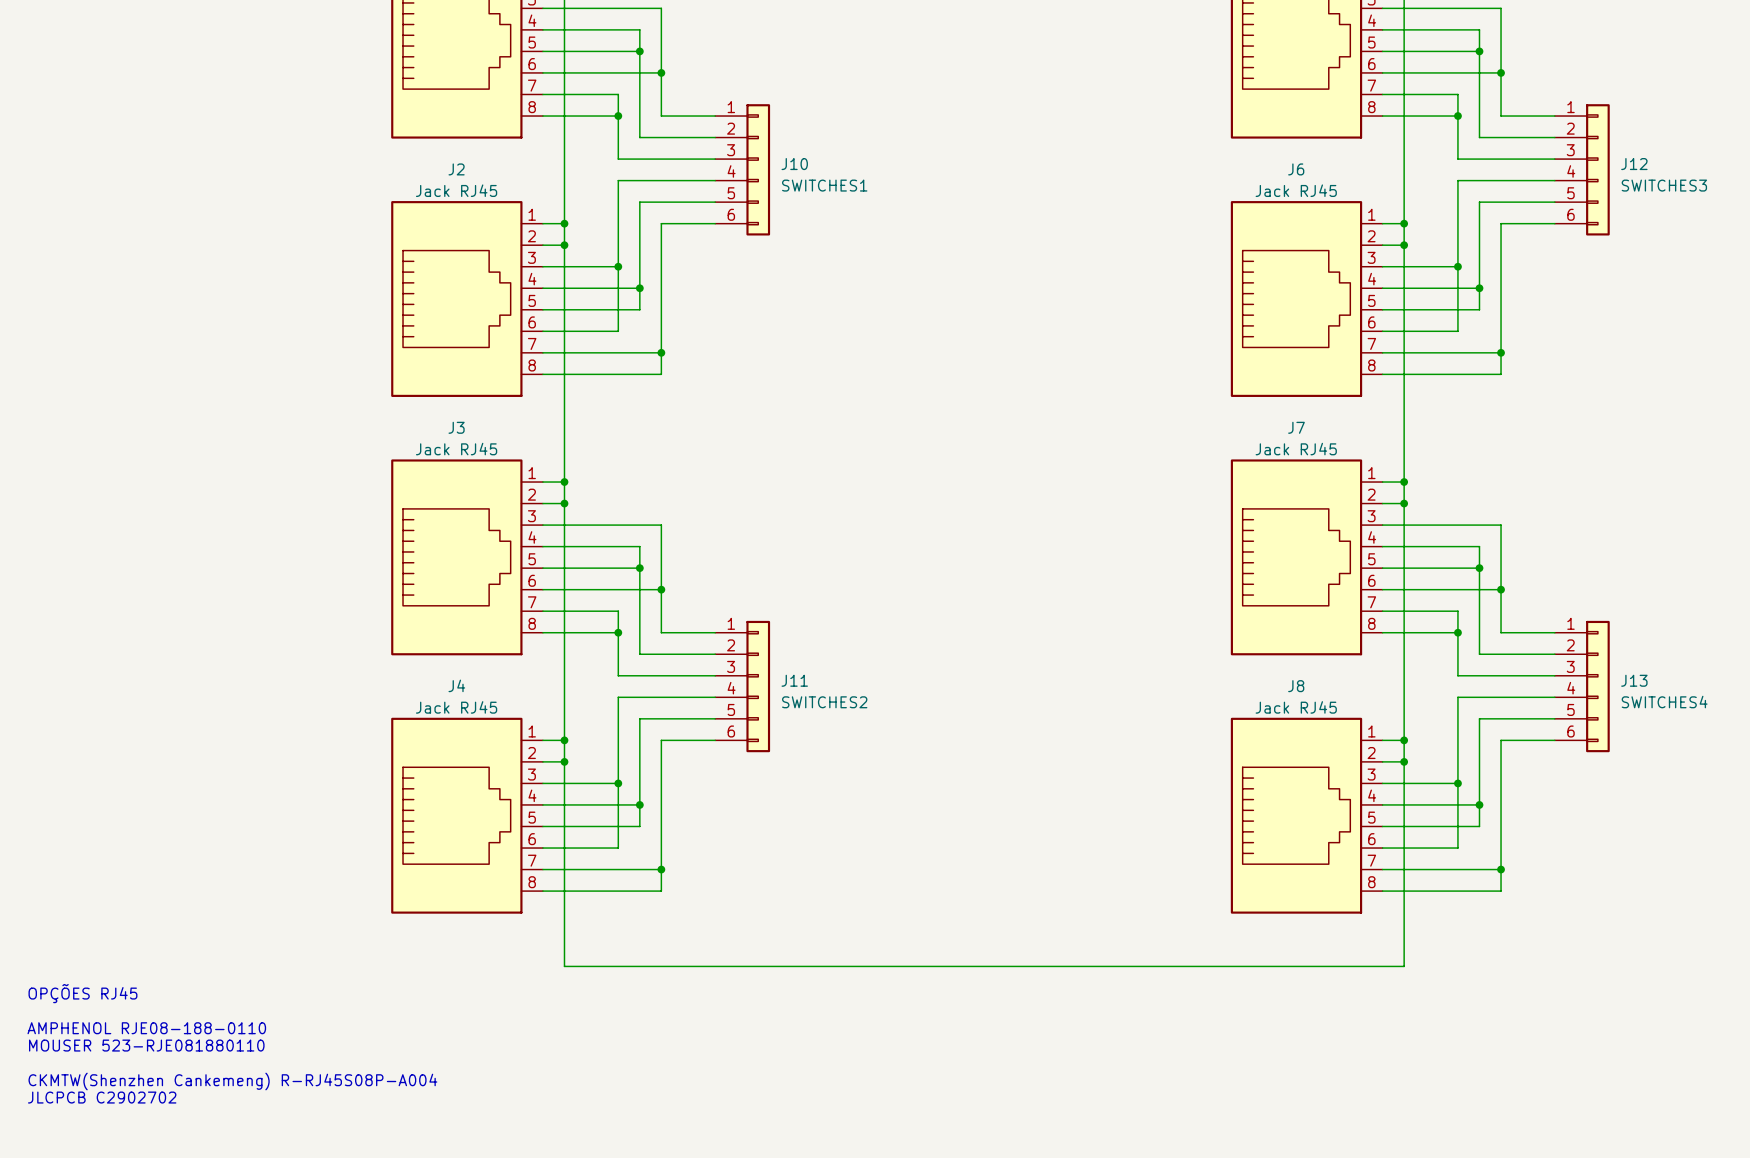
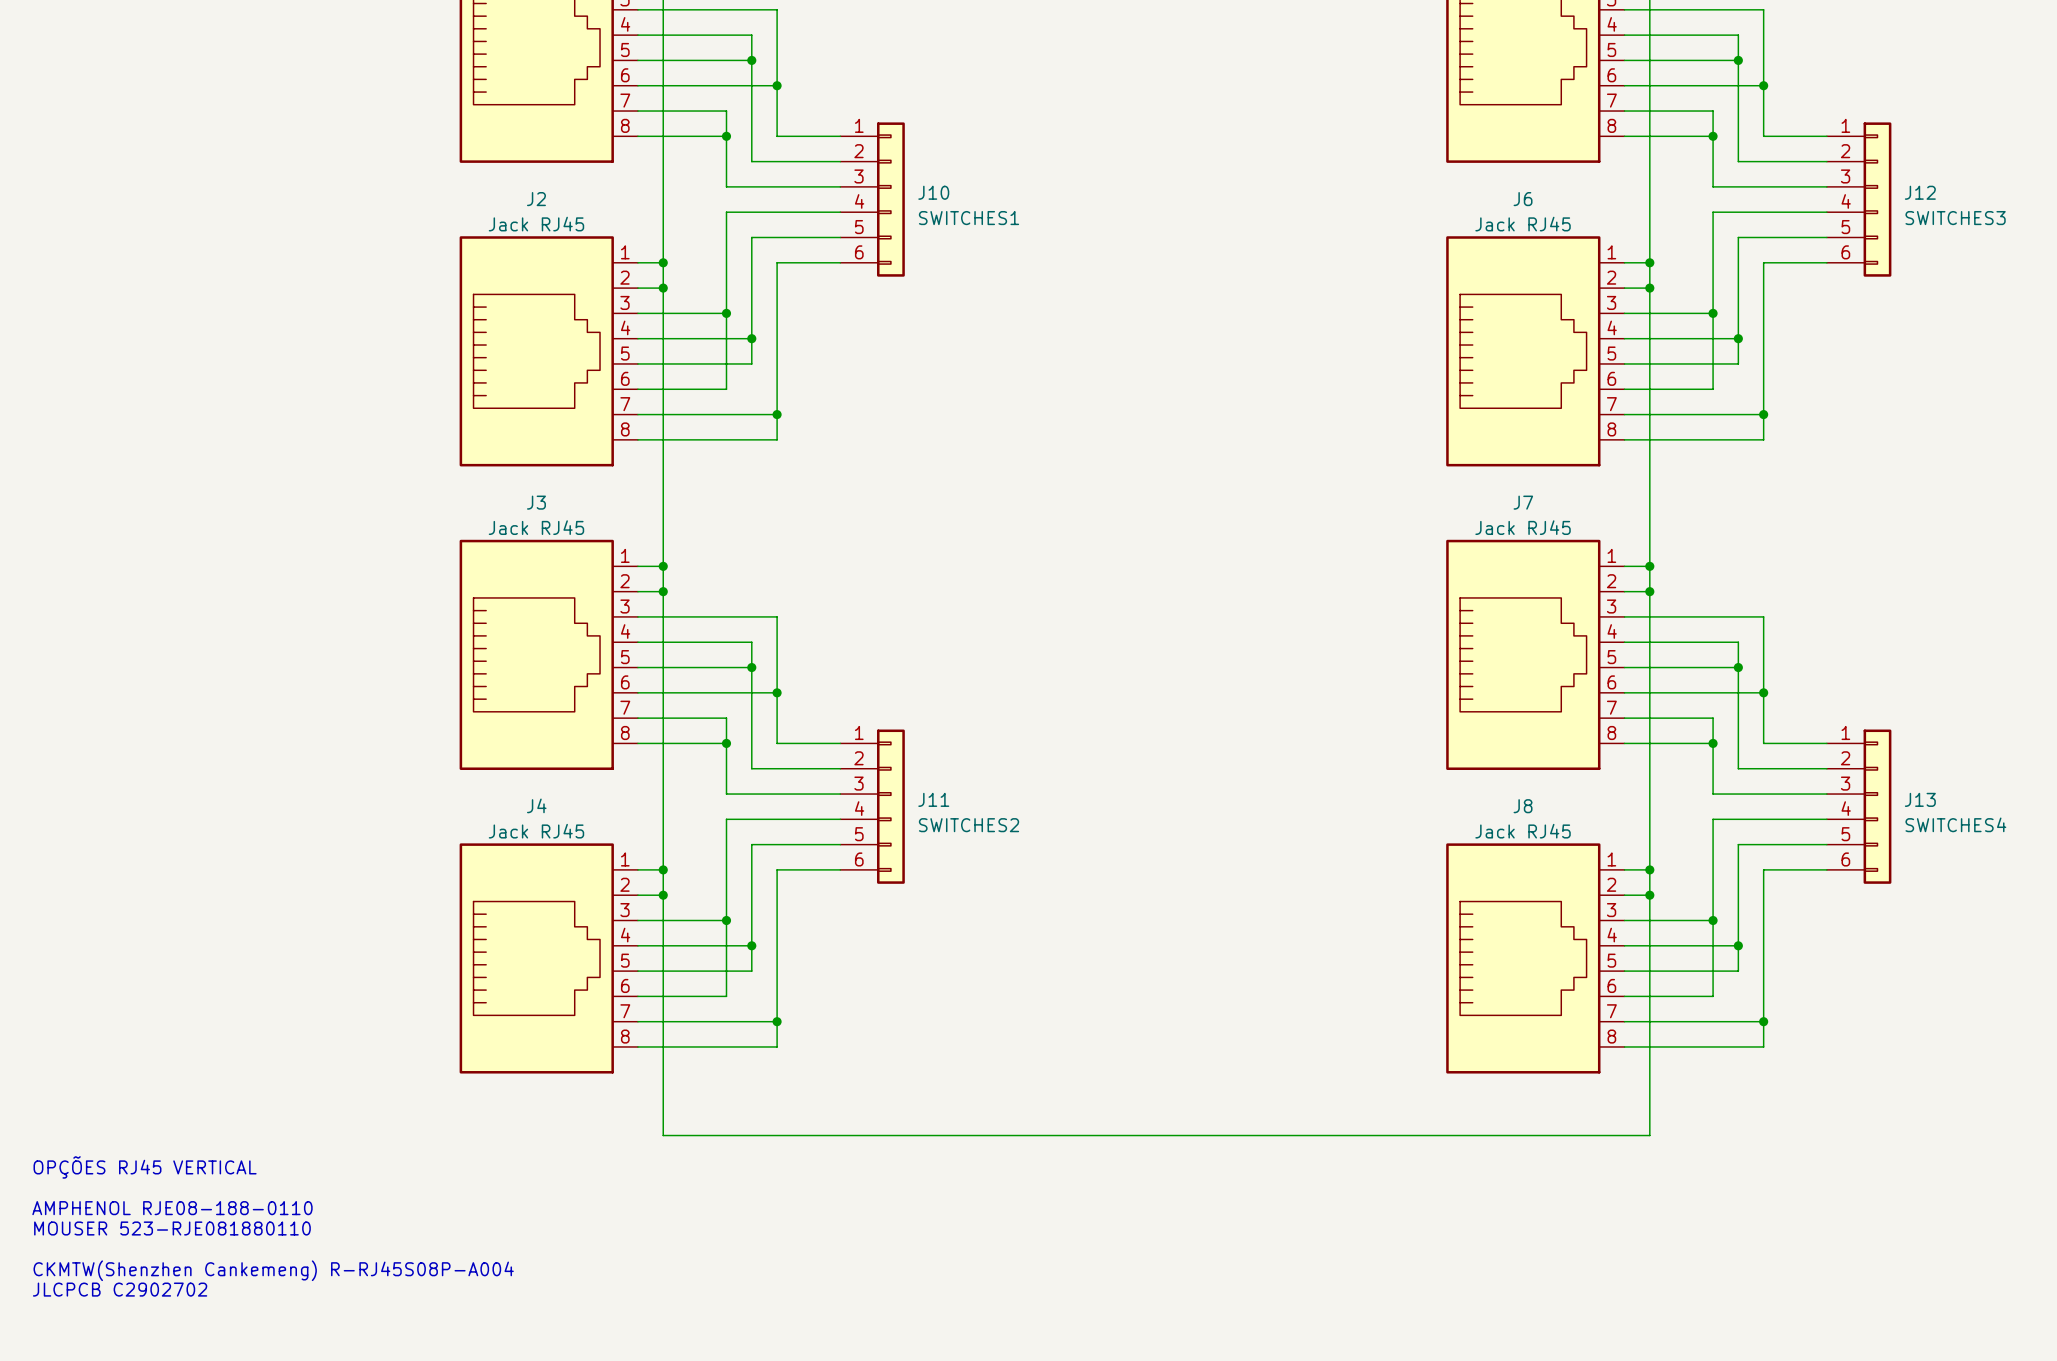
text: OPÇÕES RJ45 (82, 993) -> OPÇÕES RJ45 VERTICAL (145, 1167)

